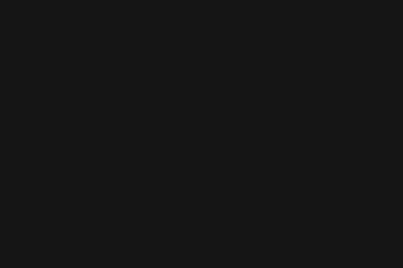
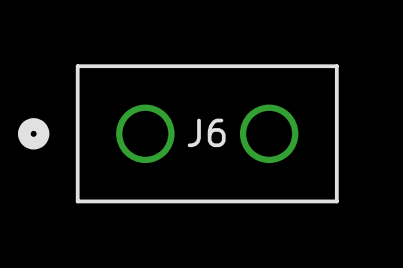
J6: none -> (178, 133)

